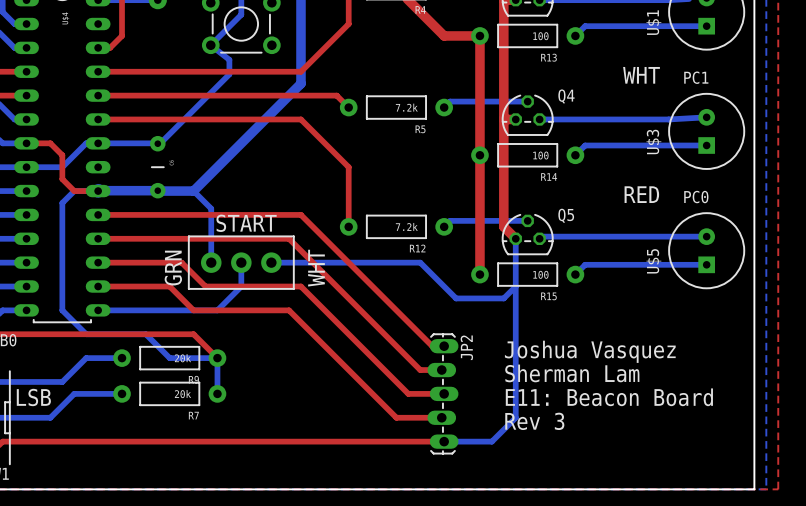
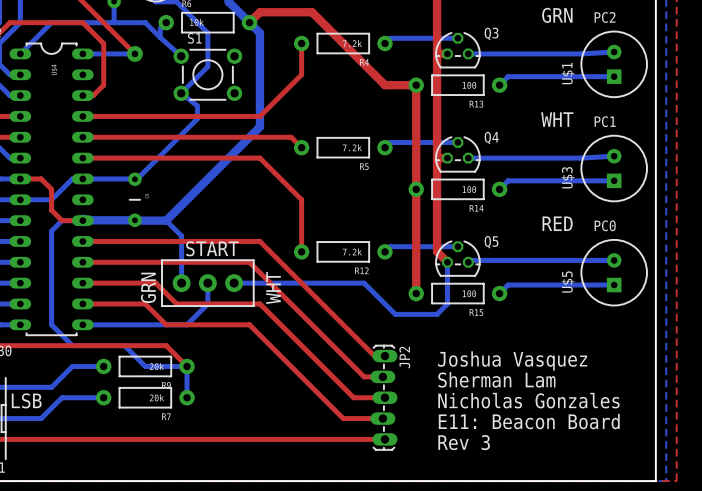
bottom track: (515, 286) (515, 417) (491, 441) (444, 441) -> none
text: E11: Beacon Board (609, 397) -> Nicholas Gonzales (528, 400)
text: Rev 3 (534, 421) -> E11: Beacon Board (529, 421)
text: none -> Rev 3 (464, 442)

